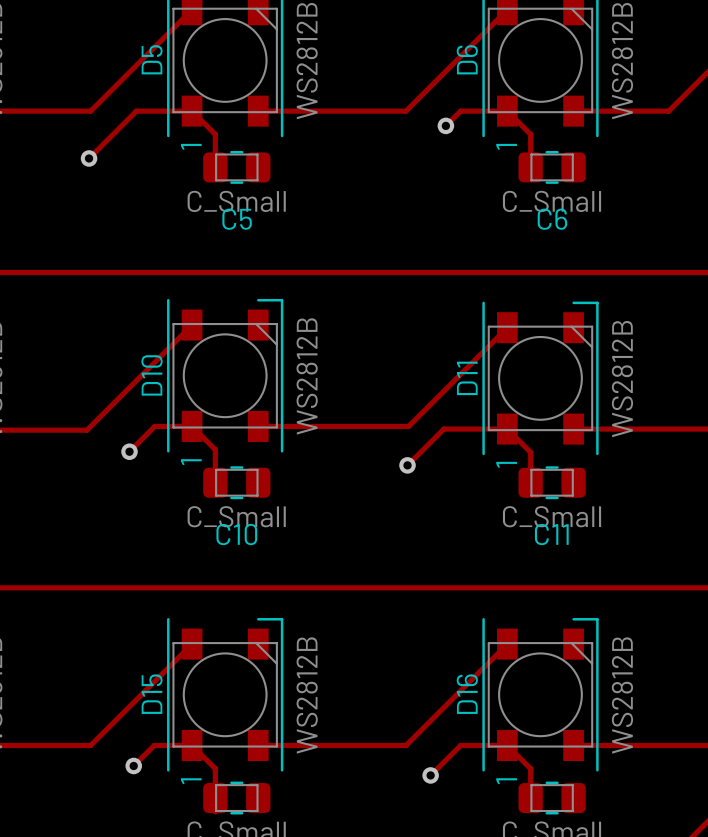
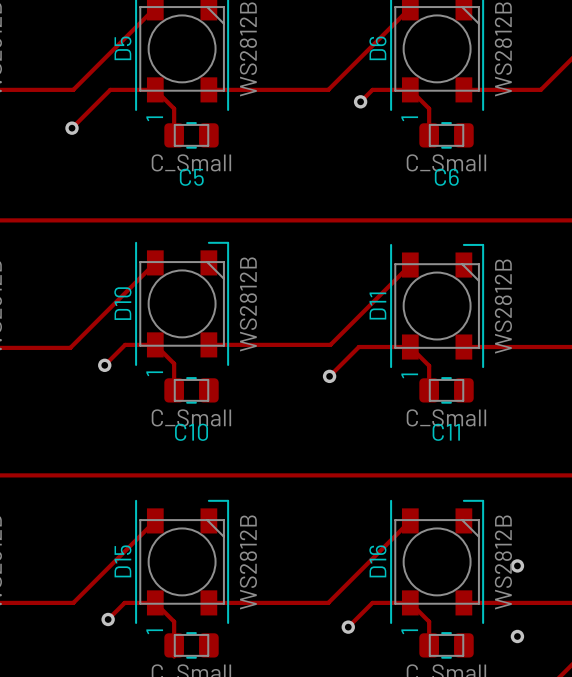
via: none -> (517, 565)
via: none -> (517, 636)

